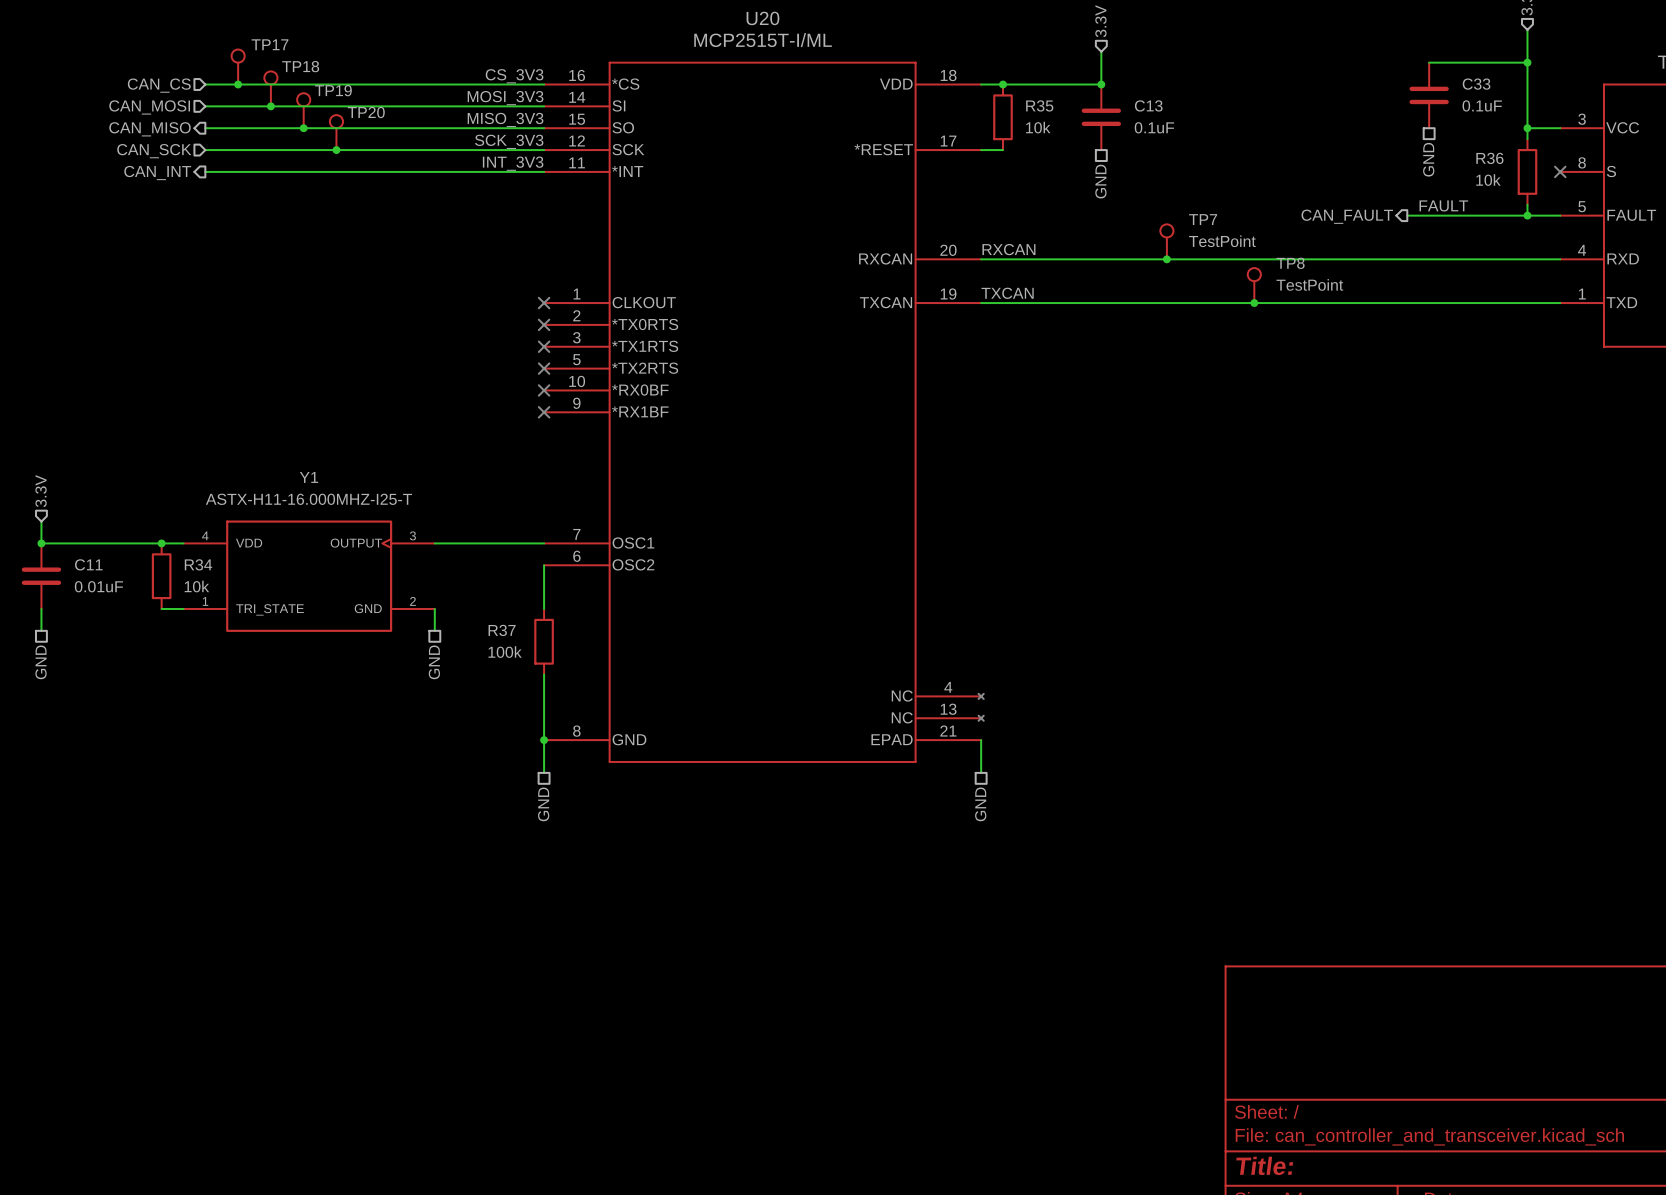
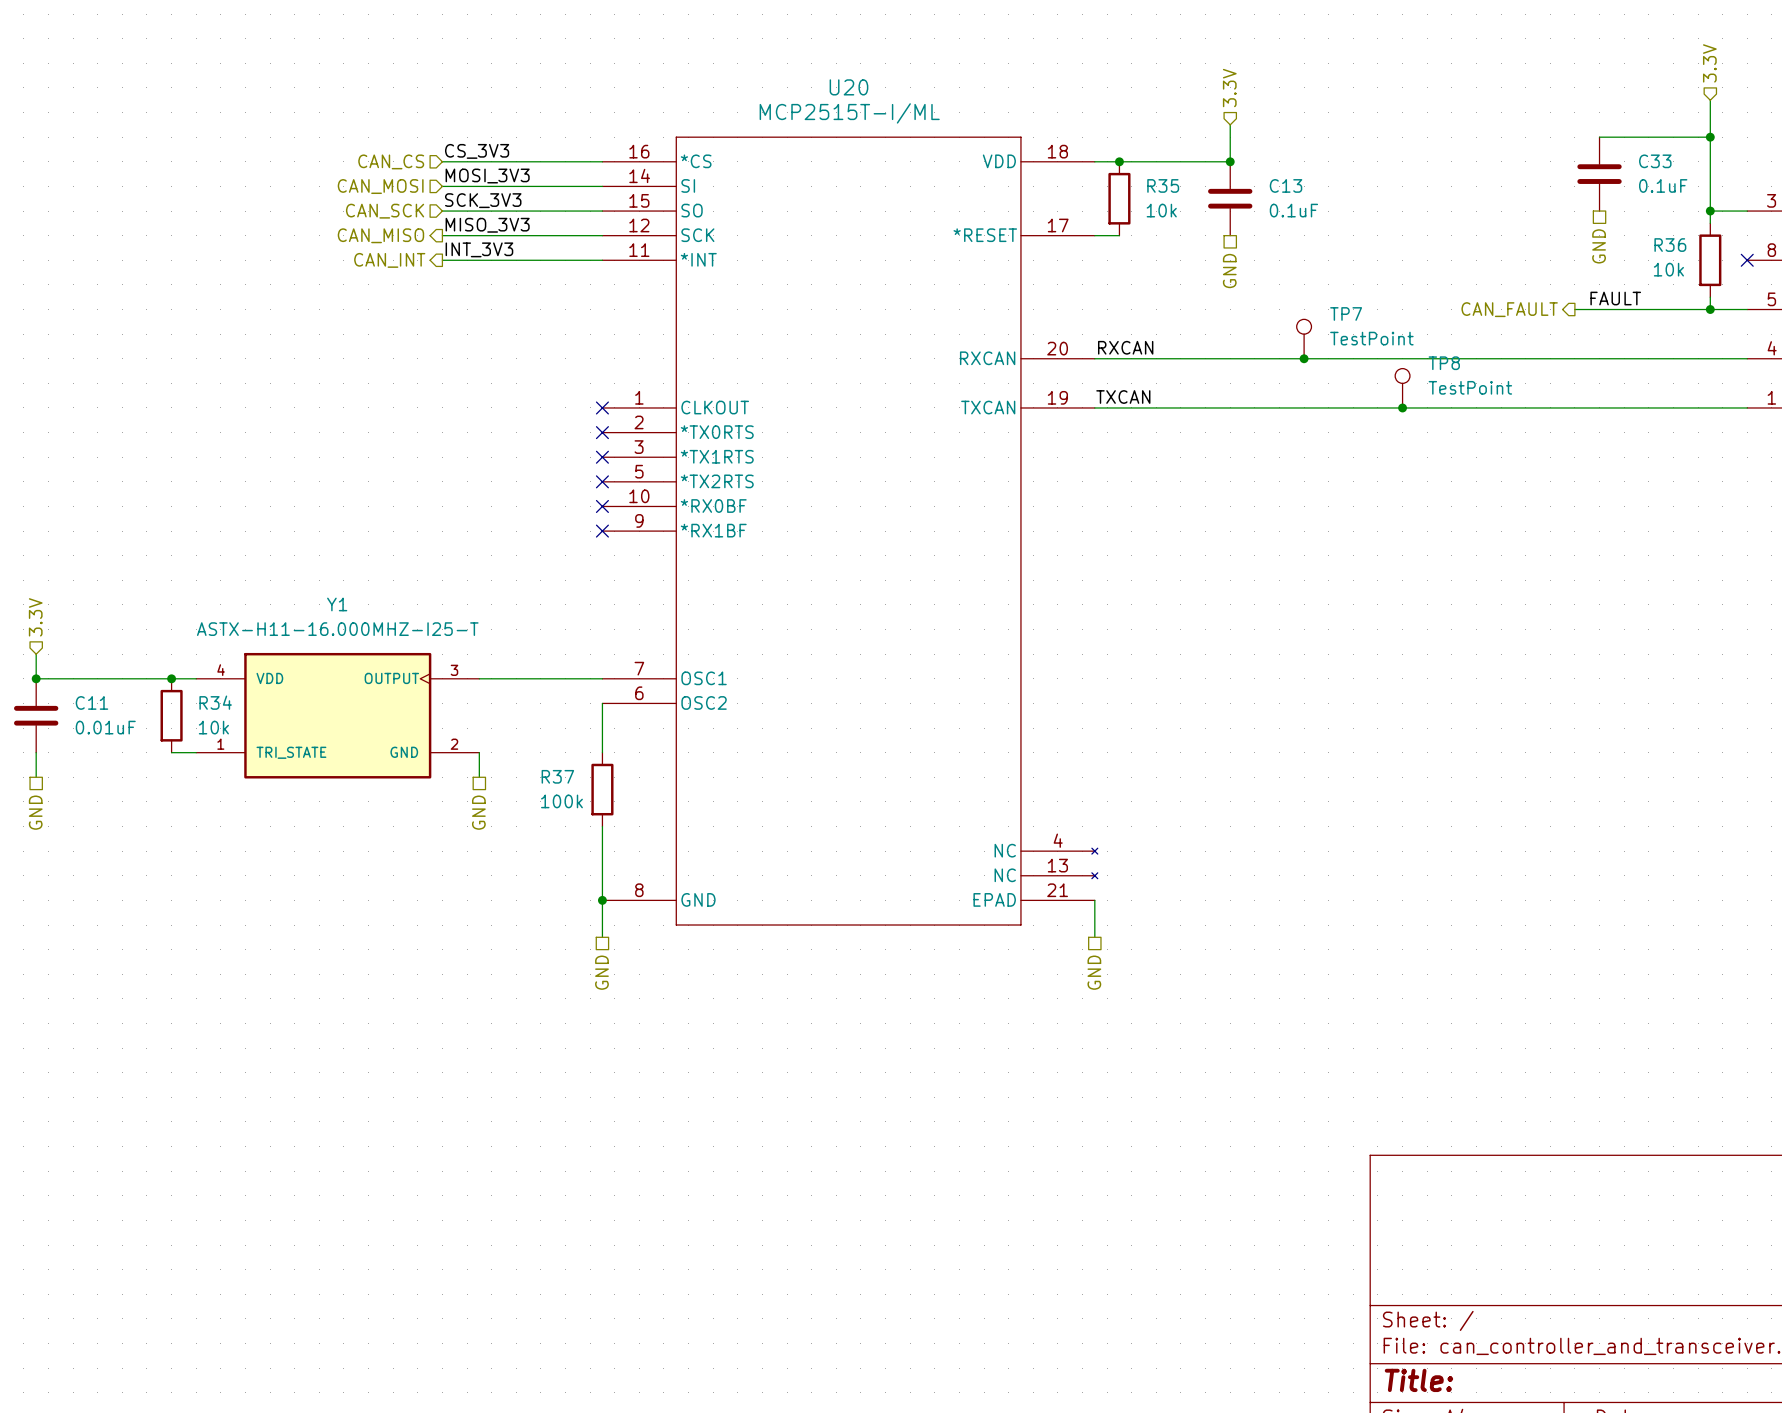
TP17: (238, 67) -> none
label position: CS_3V3 (514, 76) -> CS_3V3 (477, 151)
wire: (205, 84) (402, 84) -> none
junction: (238, 84) -> none
hierarchical label position: CAN_CS (159, 85) -> CAN_CS (391, 161)
TP18: (270, 88) -> none
label position: MOSI_3V3 (505, 98) -> MOSI_3V3 (487, 176)
wire: (205, 106) (402, 106) -> none
junction: (270, 106) -> none
hierarchical label position: CAN_MOSI (149, 107) -> CAN_MOSI (380, 186)
TP19: (303, 110) -> none
label position: MISO_3V3 (505, 119) -> MISO_3V3 (487, 225)
wire: (205, 128) (402, 128) -> none
junction: (303, 128) -> none
hierarchical label position: CAN_MISO (150, 129) -> CAN_MISO (380, 235)
TP20: (336, 132) -> none
label position: SCK_3V3 (509, 141) -> SCK_3V3 (483, 200)
wire: (205, 150) (402, 150) -> none
junction: (336, 150) -> none
hierarchical label position: CAN_SCK (154, 151) -> CAN_SCK (385, 211)
label position: INT_3V3 (513, 163) -> INT_3V3 (479, 249)
wire: (205, 171) (402, 171) -> none
hierarchical label position: CAN_INT (157, 173) -> CAN_INT (389, 260)

